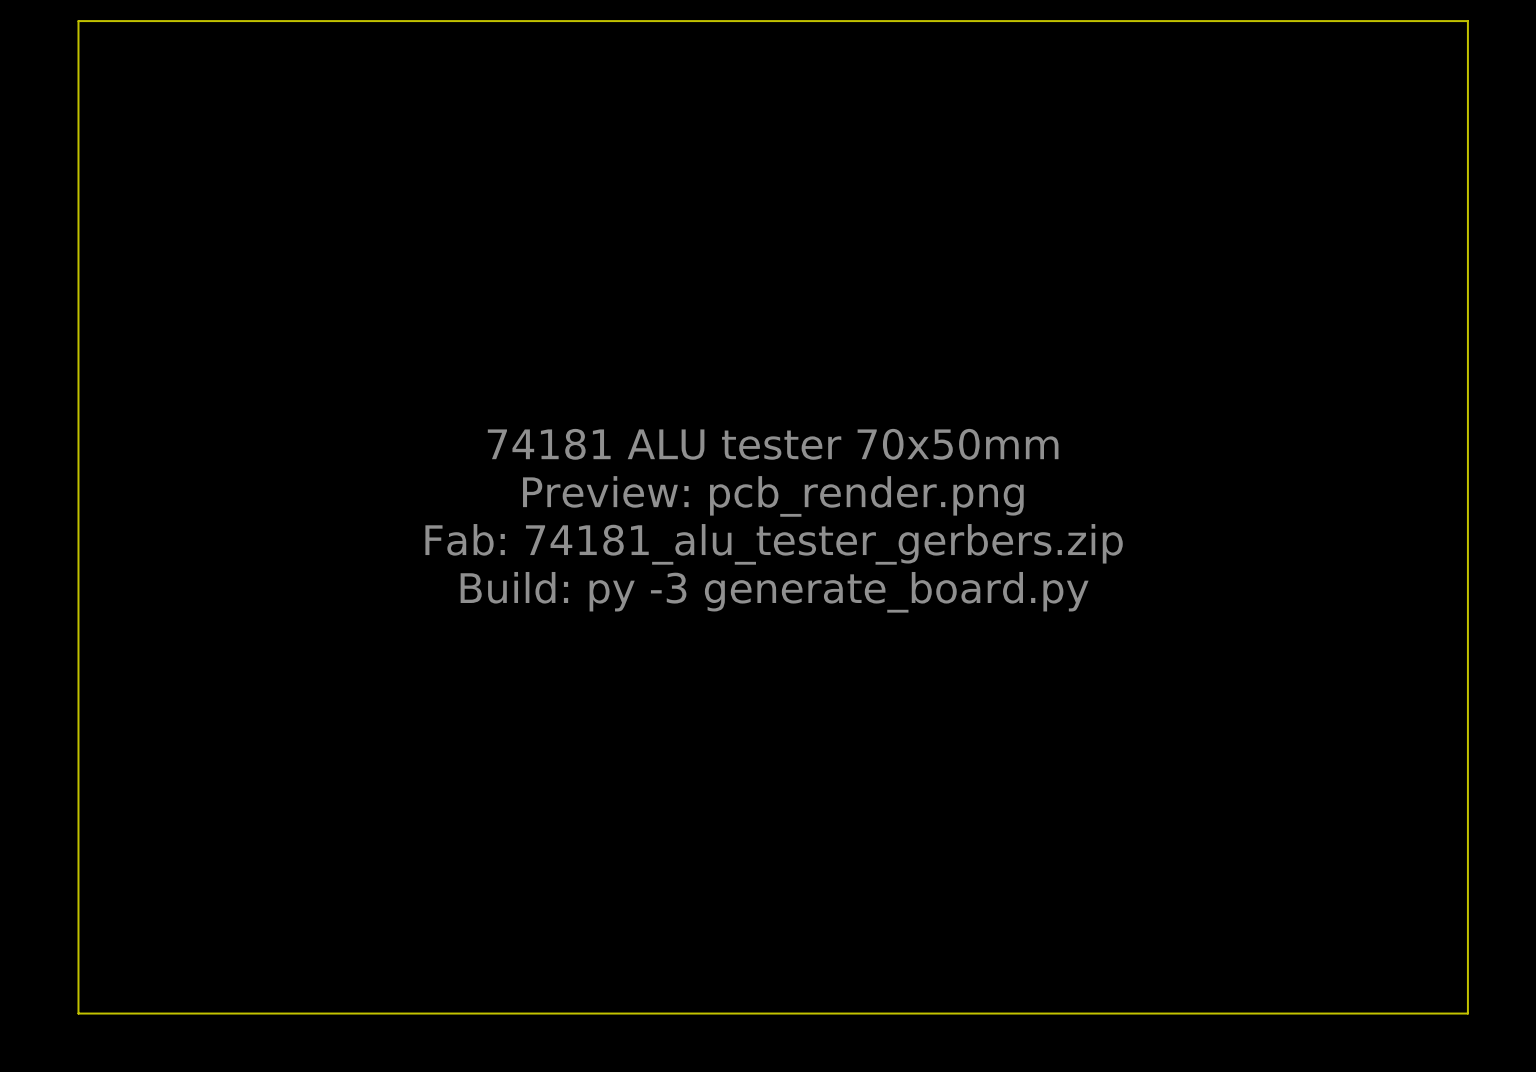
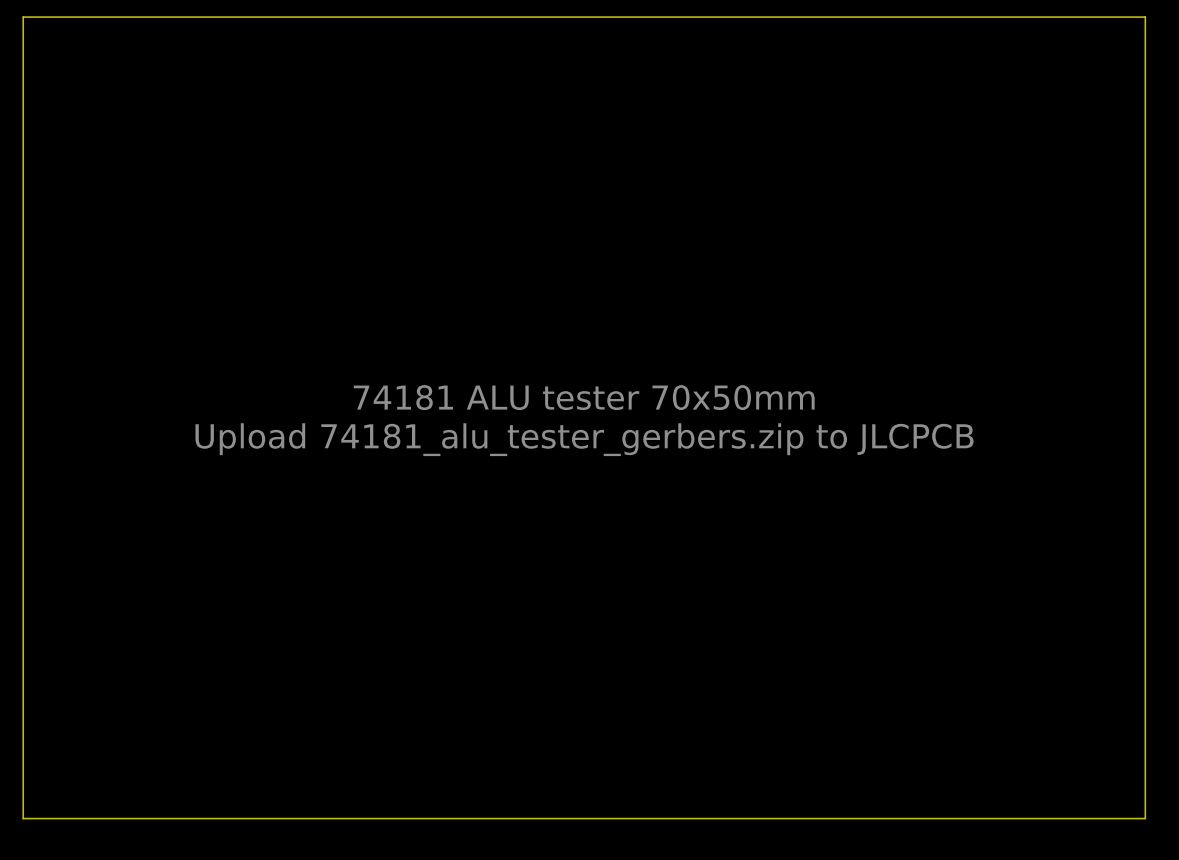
text: 74181 ALU tester 70x50mm (773, 444) -> none
text: Preview: pcb_render.png (773, 496) -> 74181 ALU tester 70x50mm (584, 397)
text: Fab: 74181_alu_tester_gerbers.zip (774, 544) -> Upload 74181_alu_tester_gerbers.zip to JLCPCB (584, 439)
text: Build: py -3 generate_board.py (774, 592) -> none

